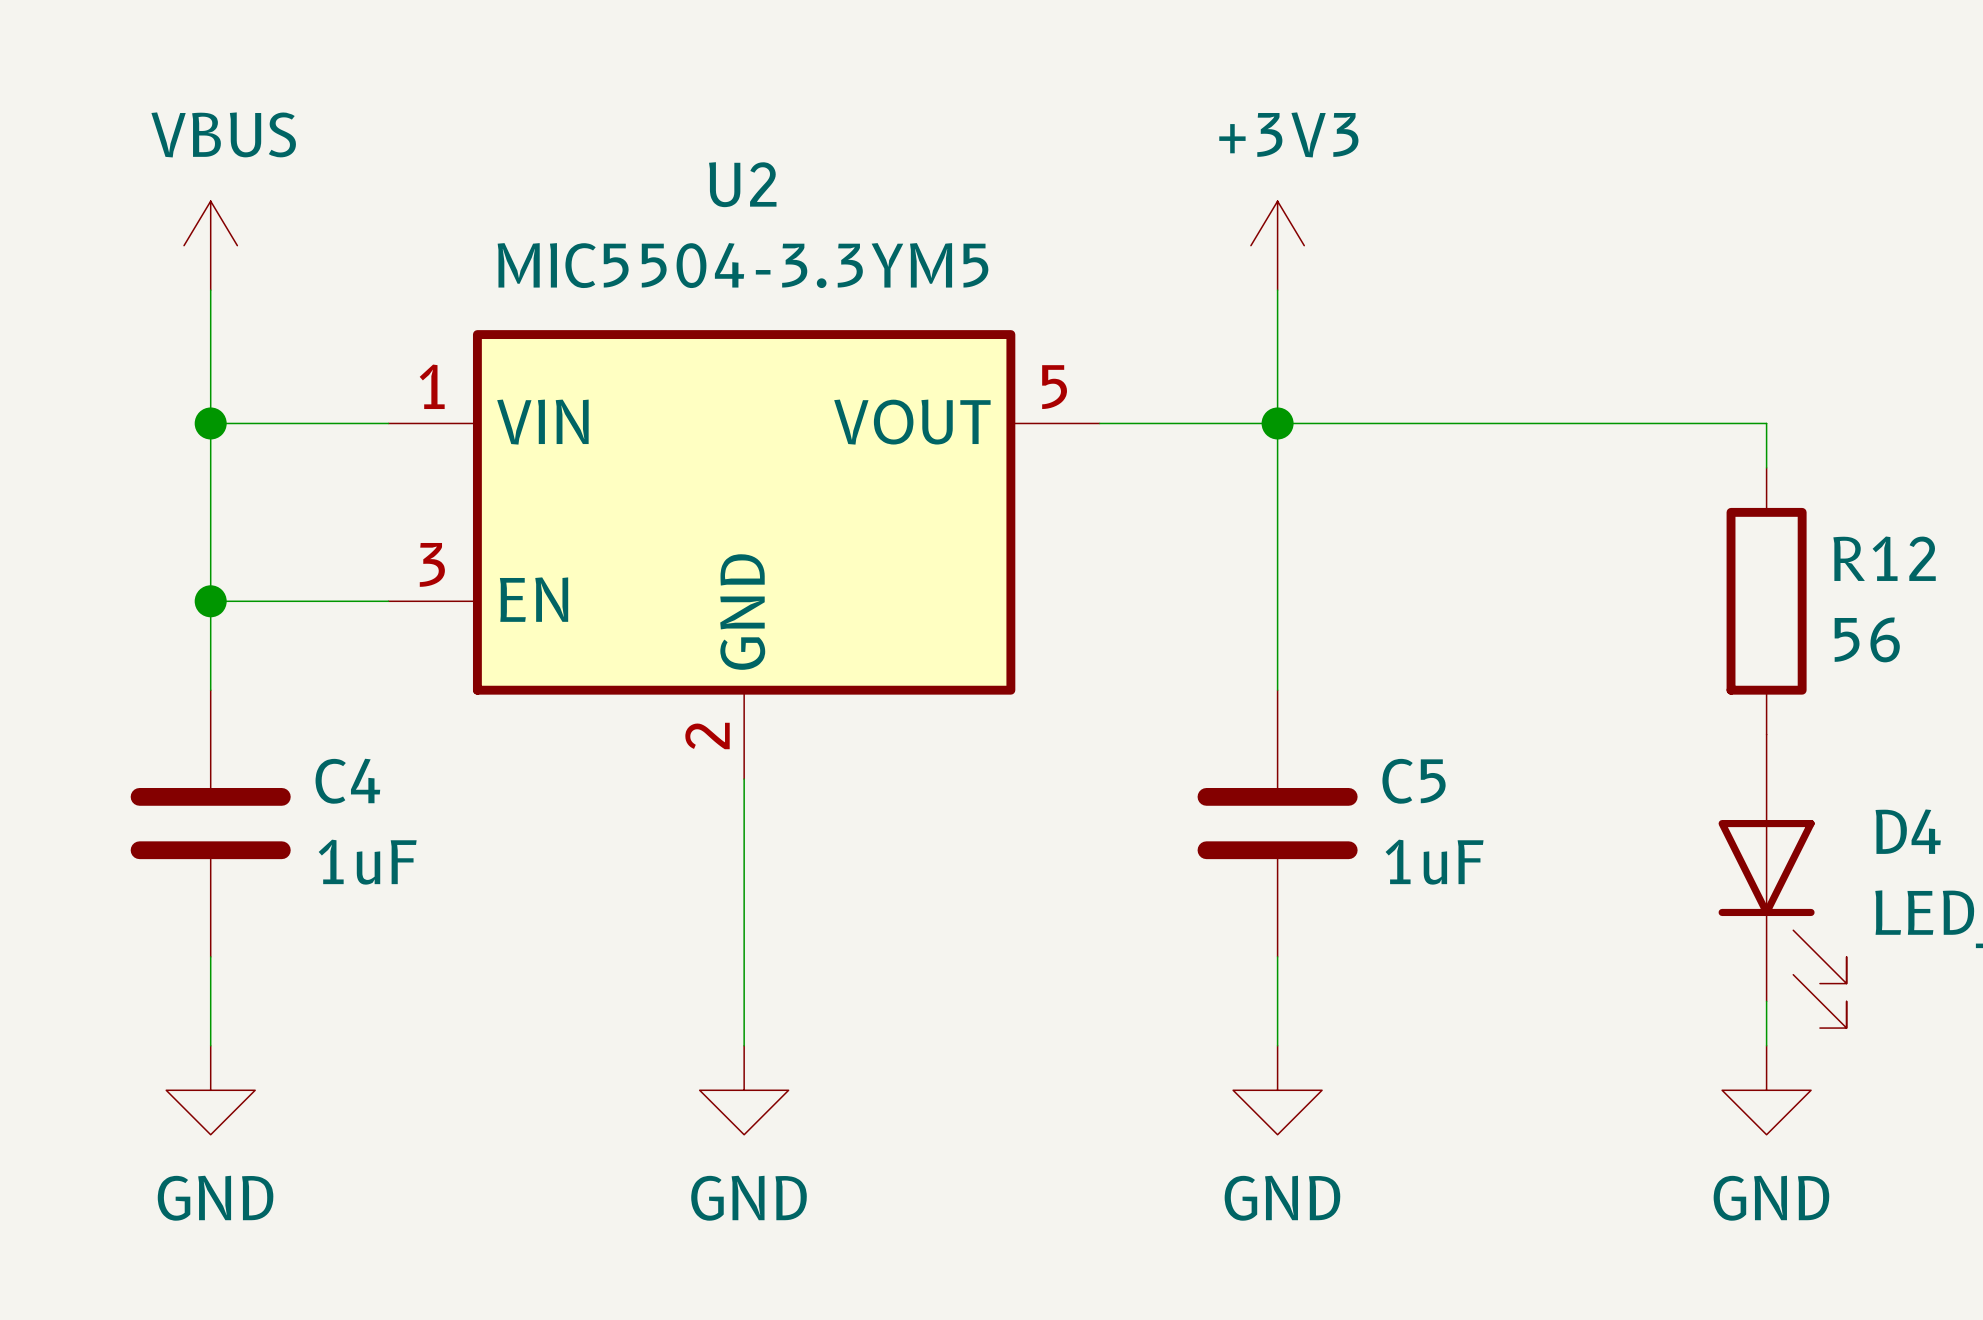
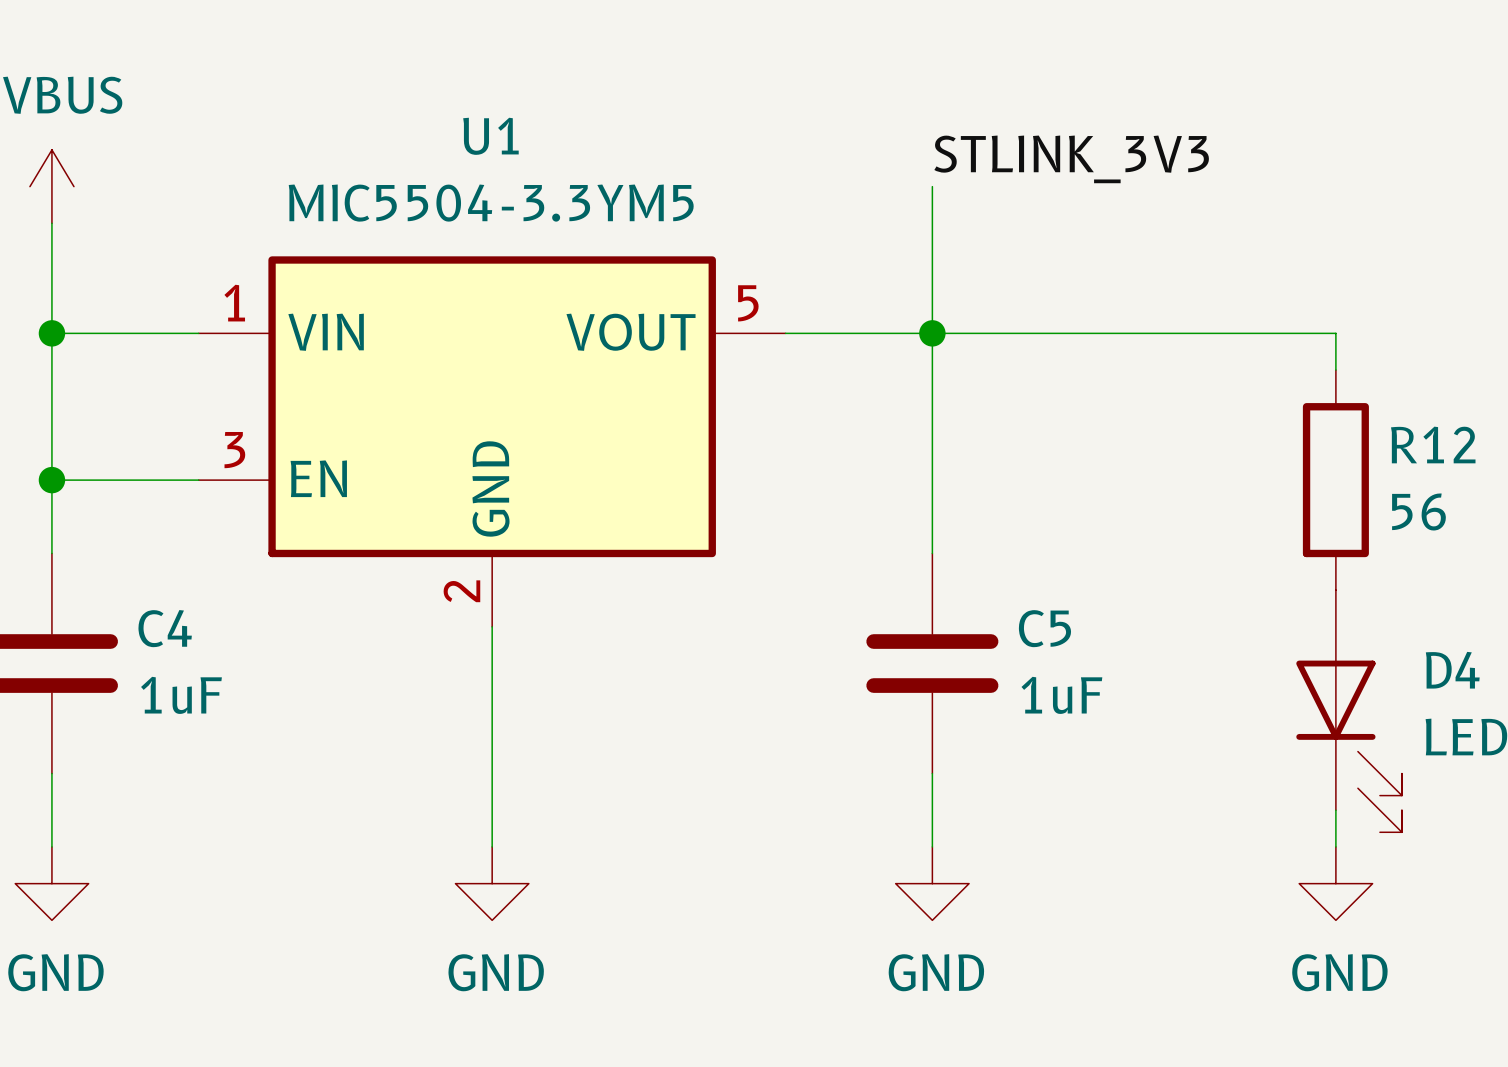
U2 name: U2 (742, 184) -> U1 (490, 136)
label: none -> STLINK_3V3 (1071, 159)
power symbol: +3V3 (1277, 245) -> none

